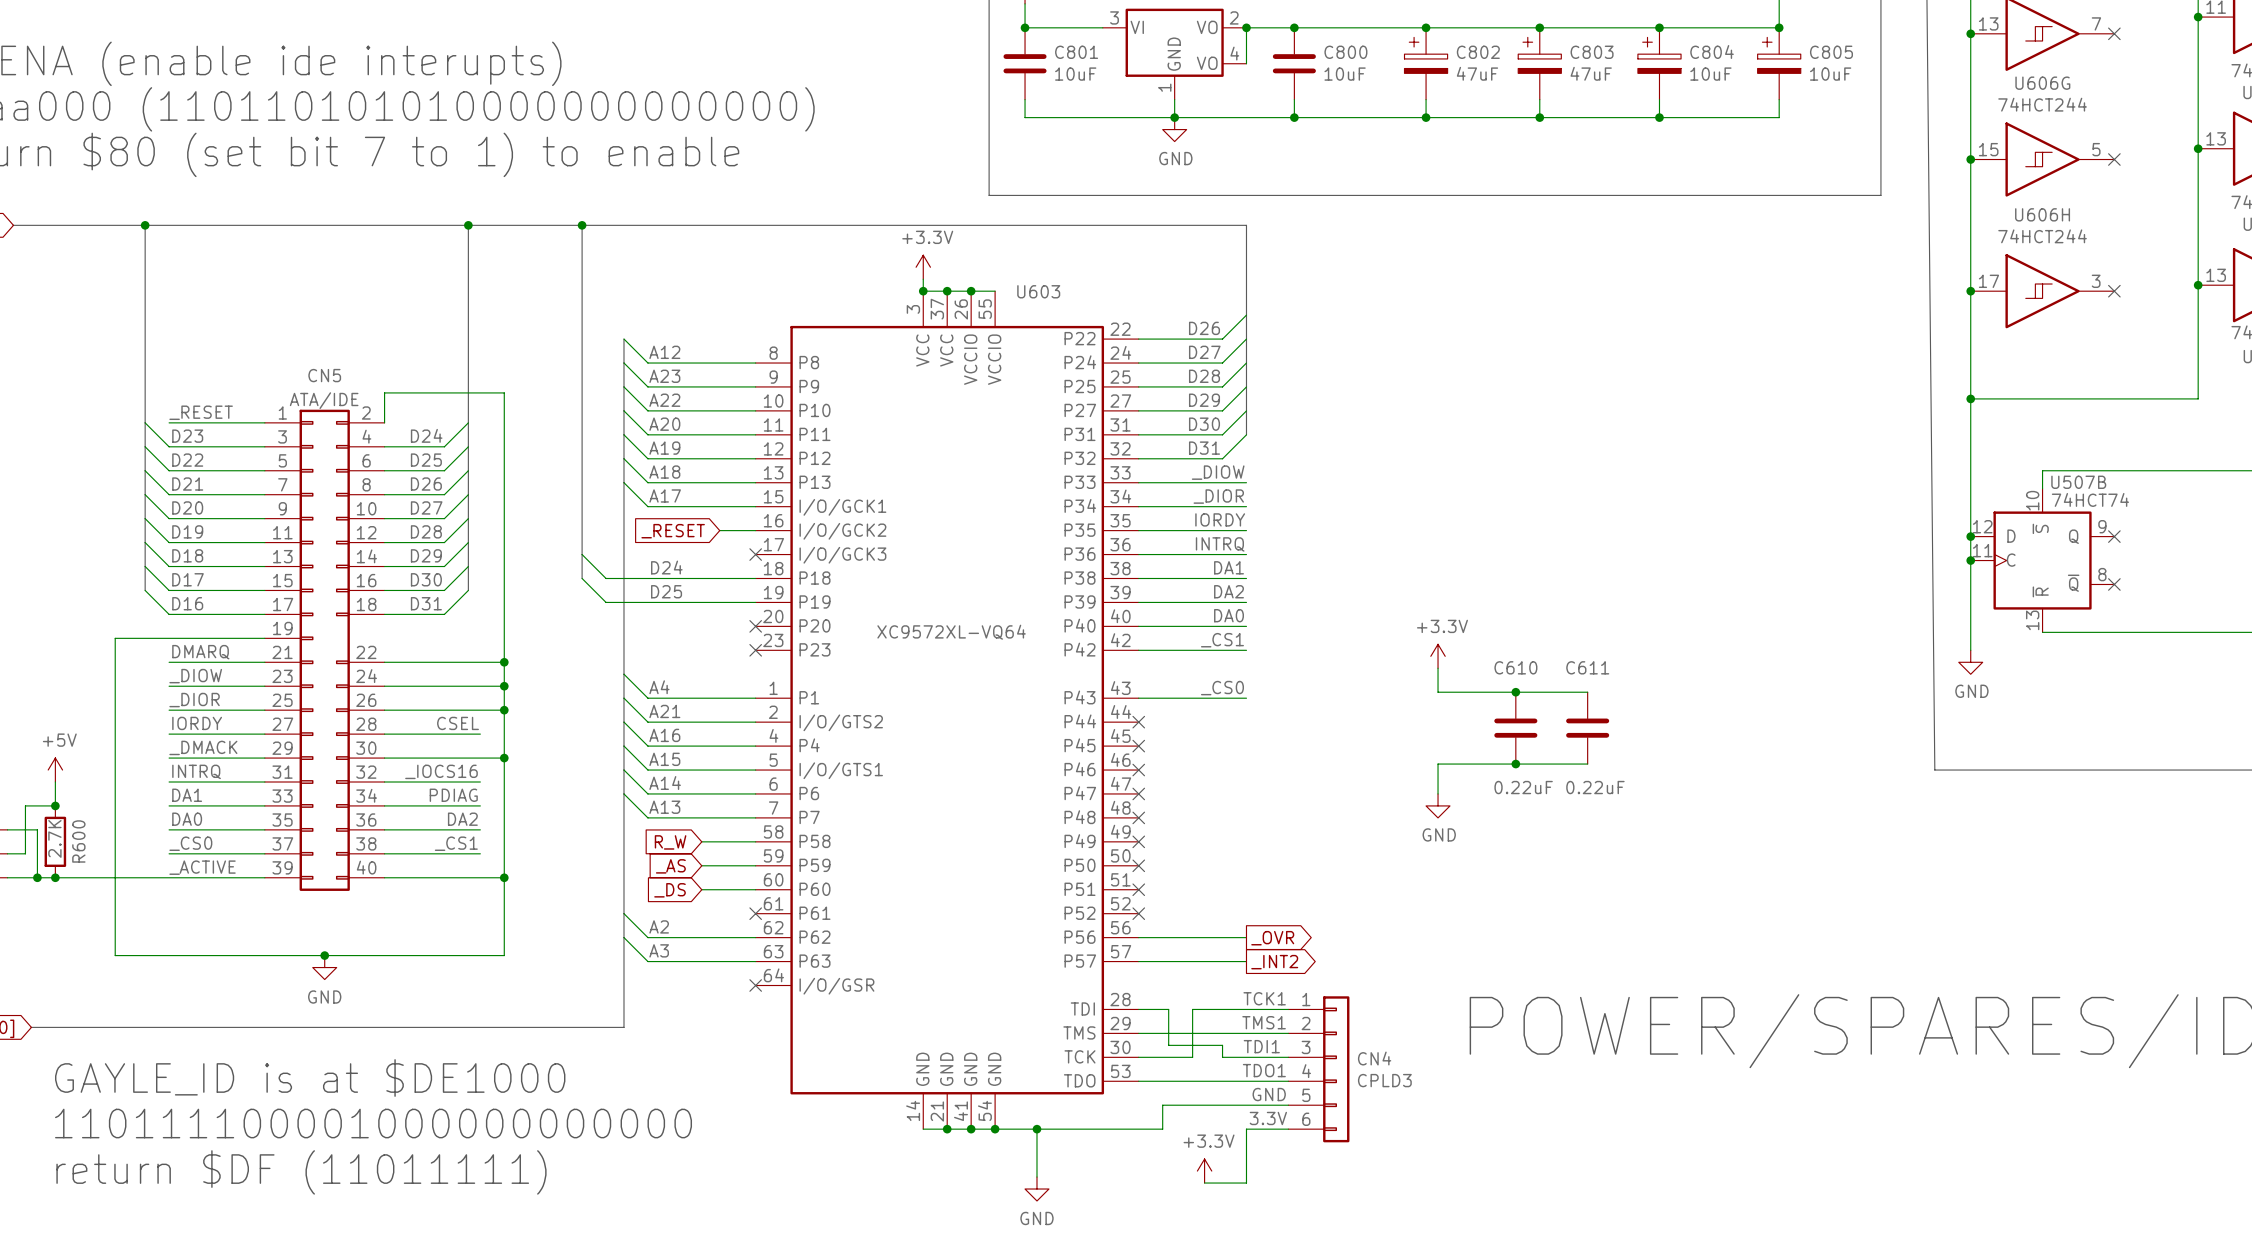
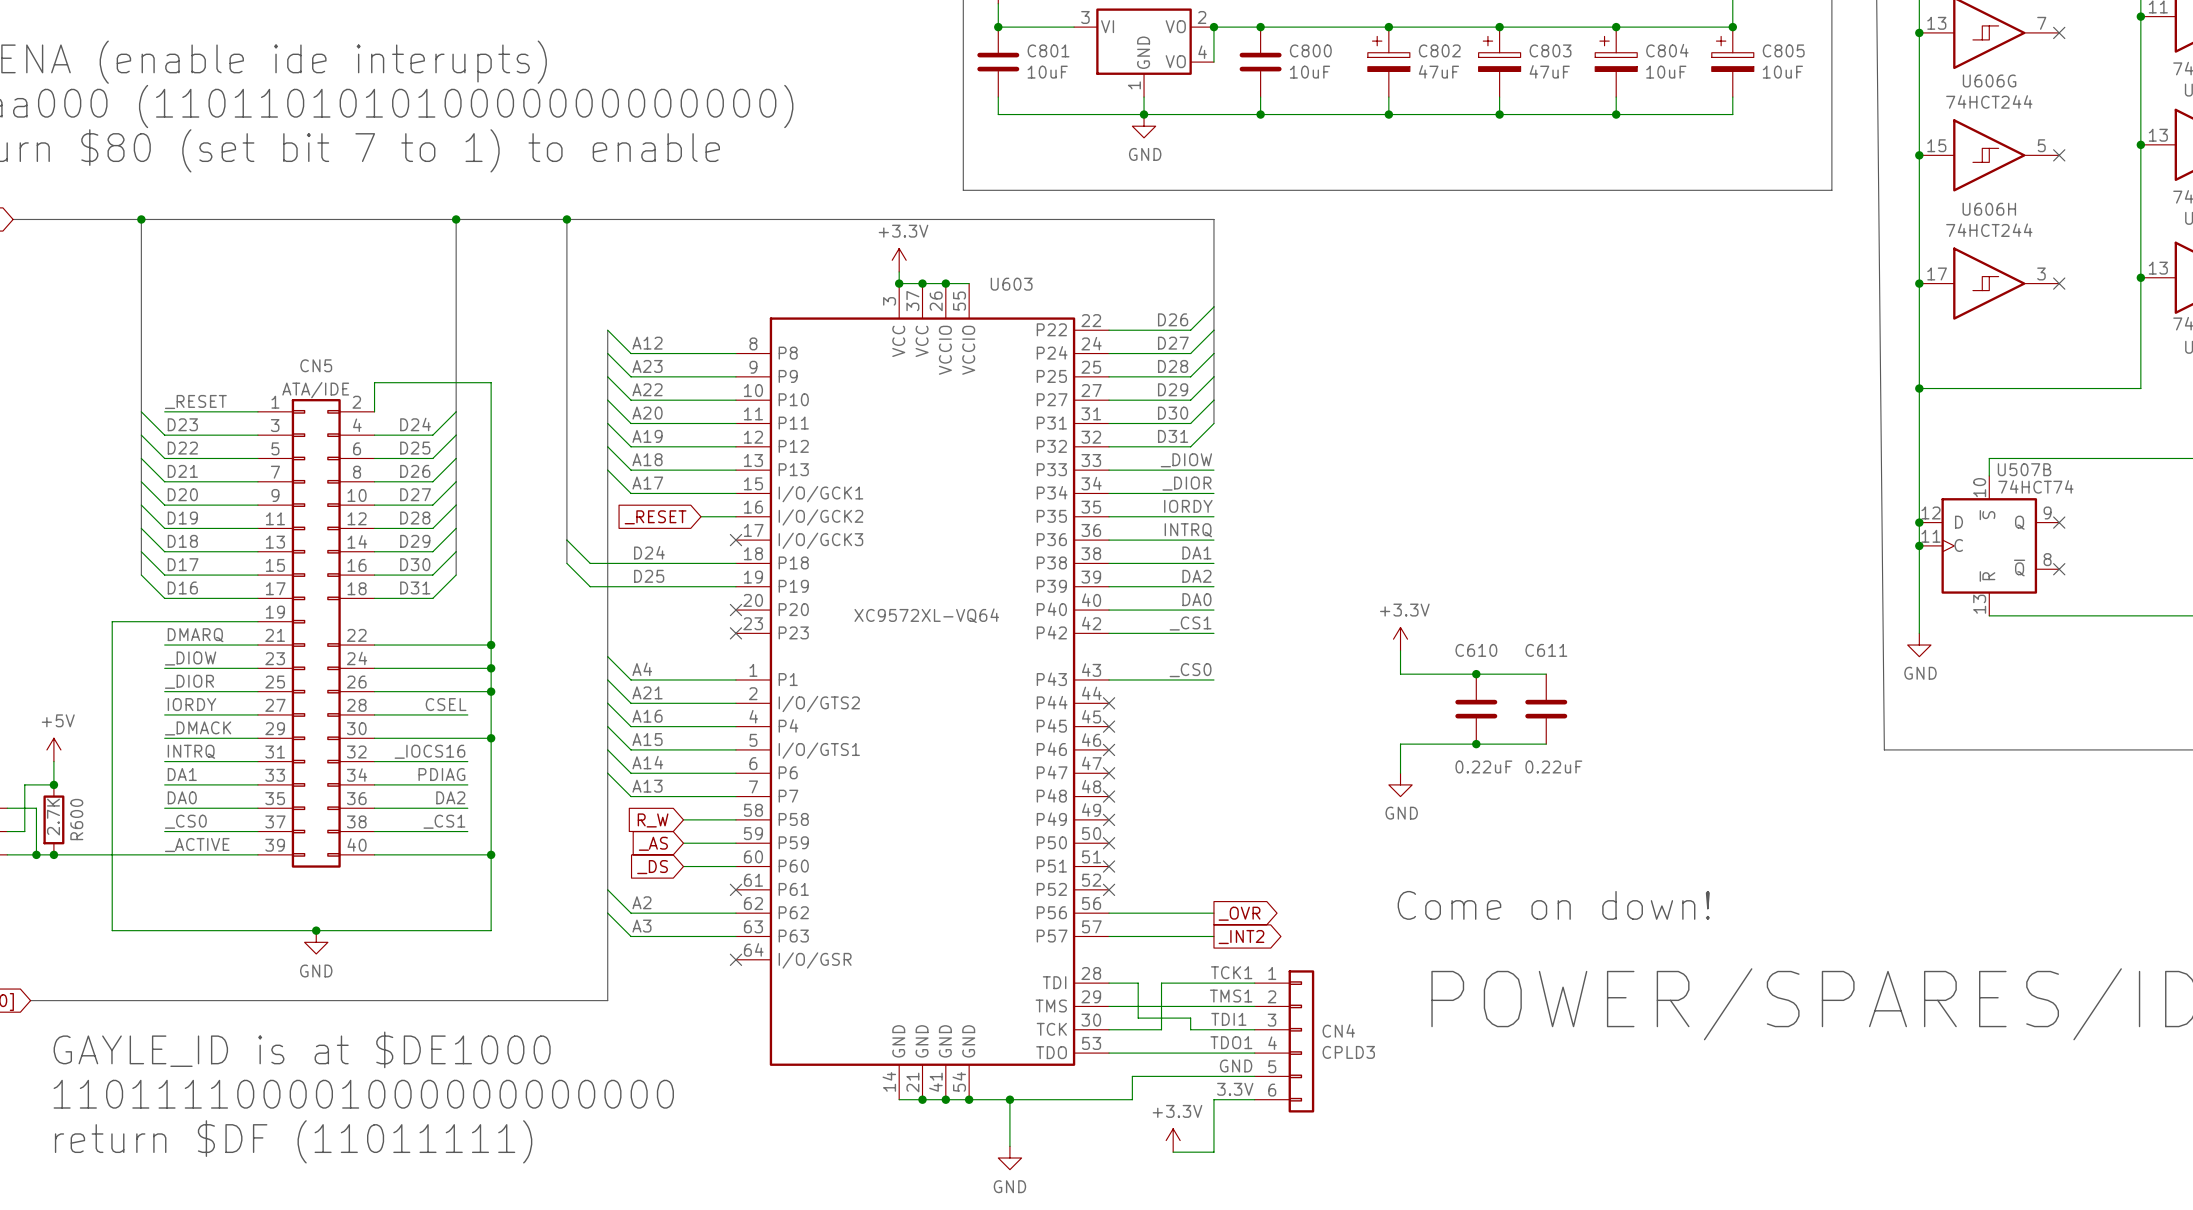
text: none -> Come on down! (1553, 905)

